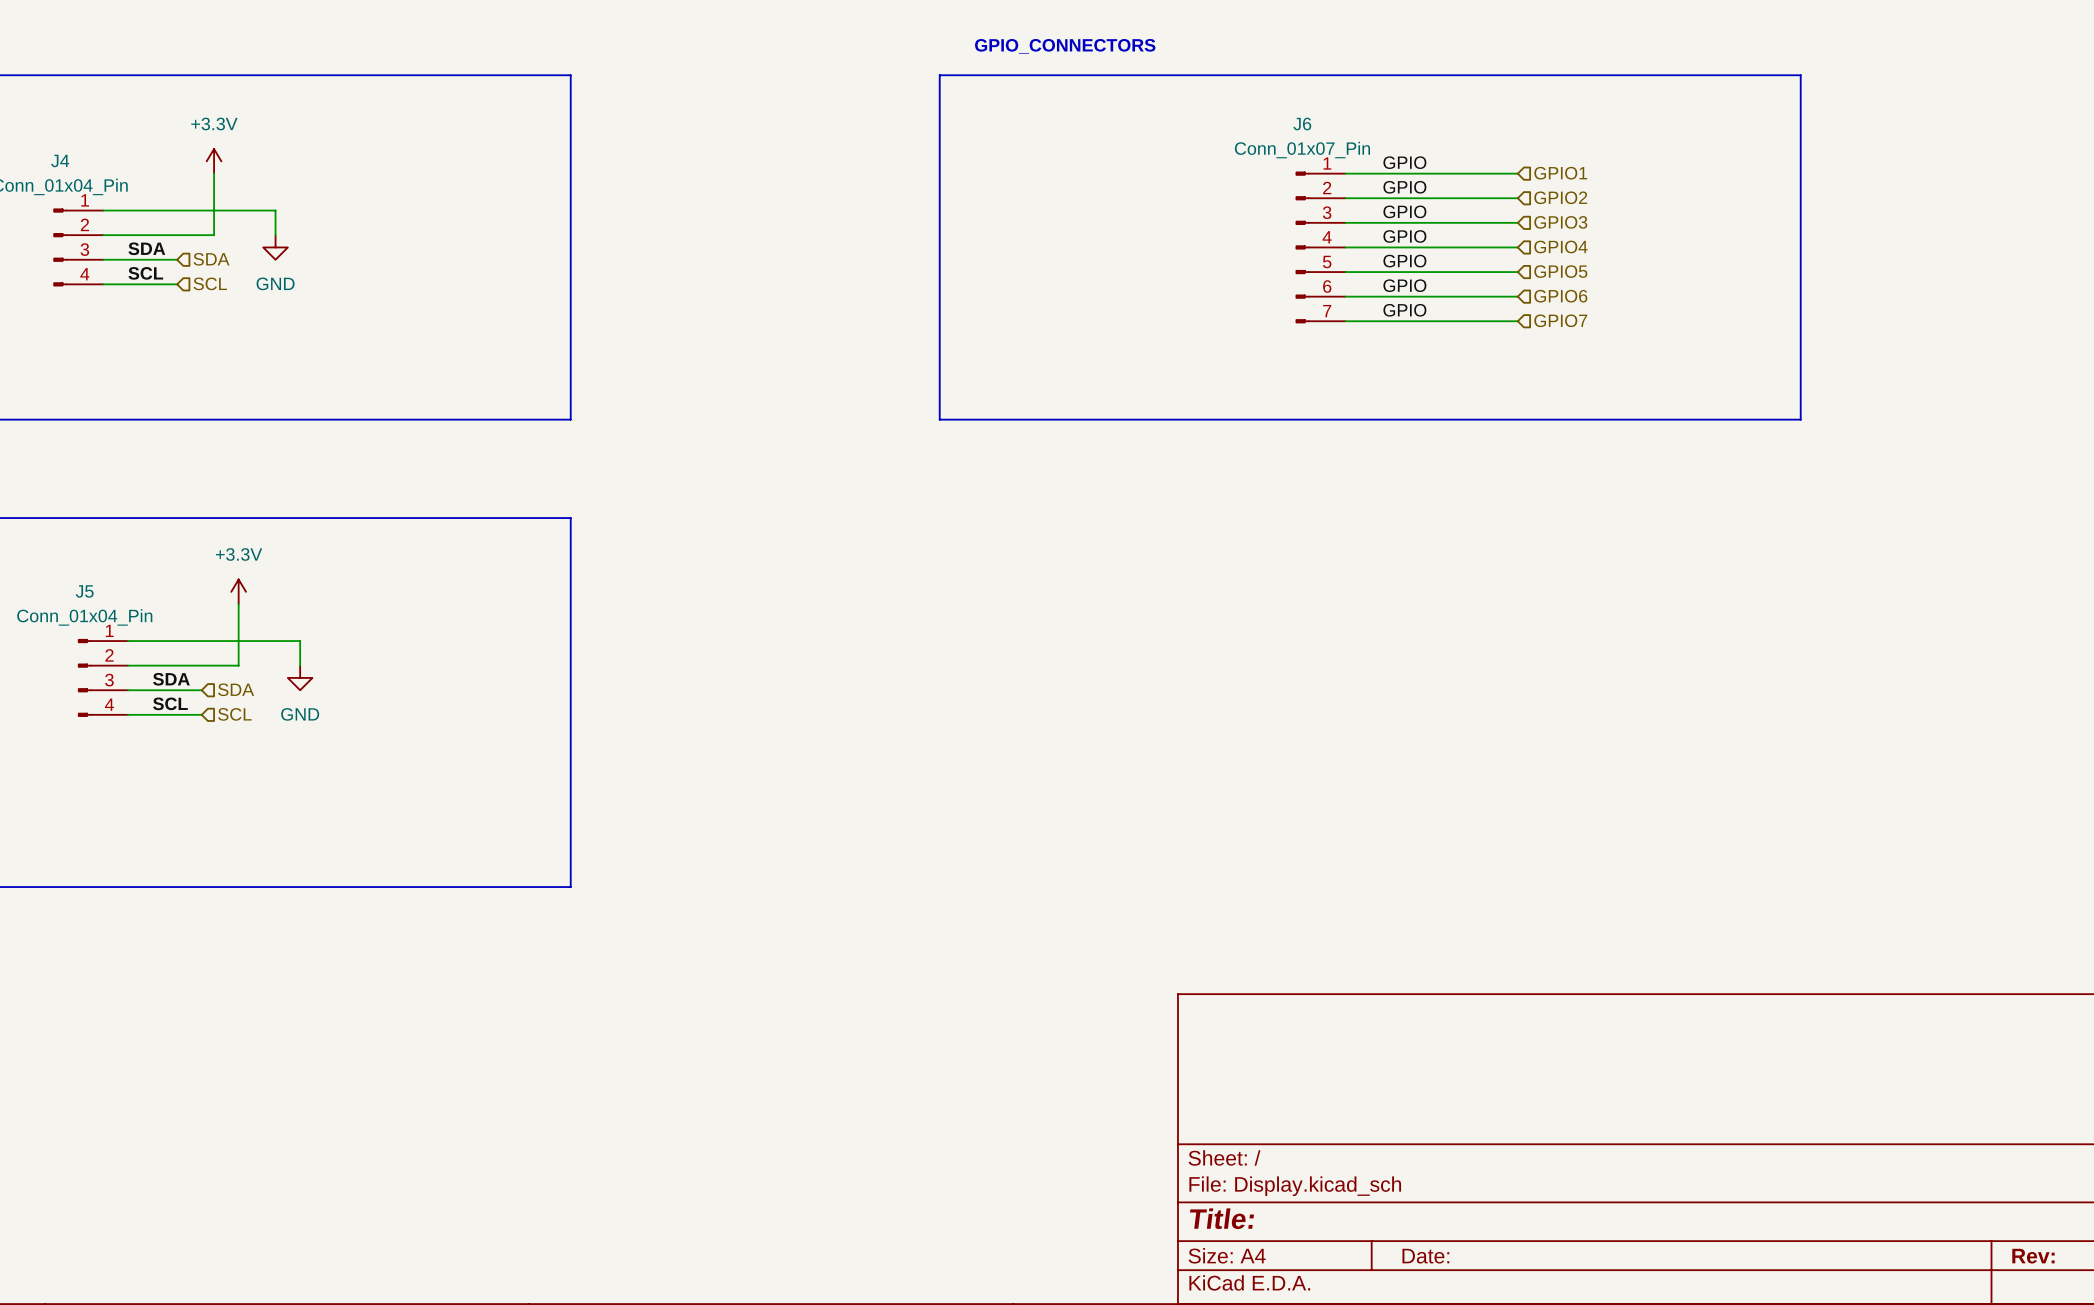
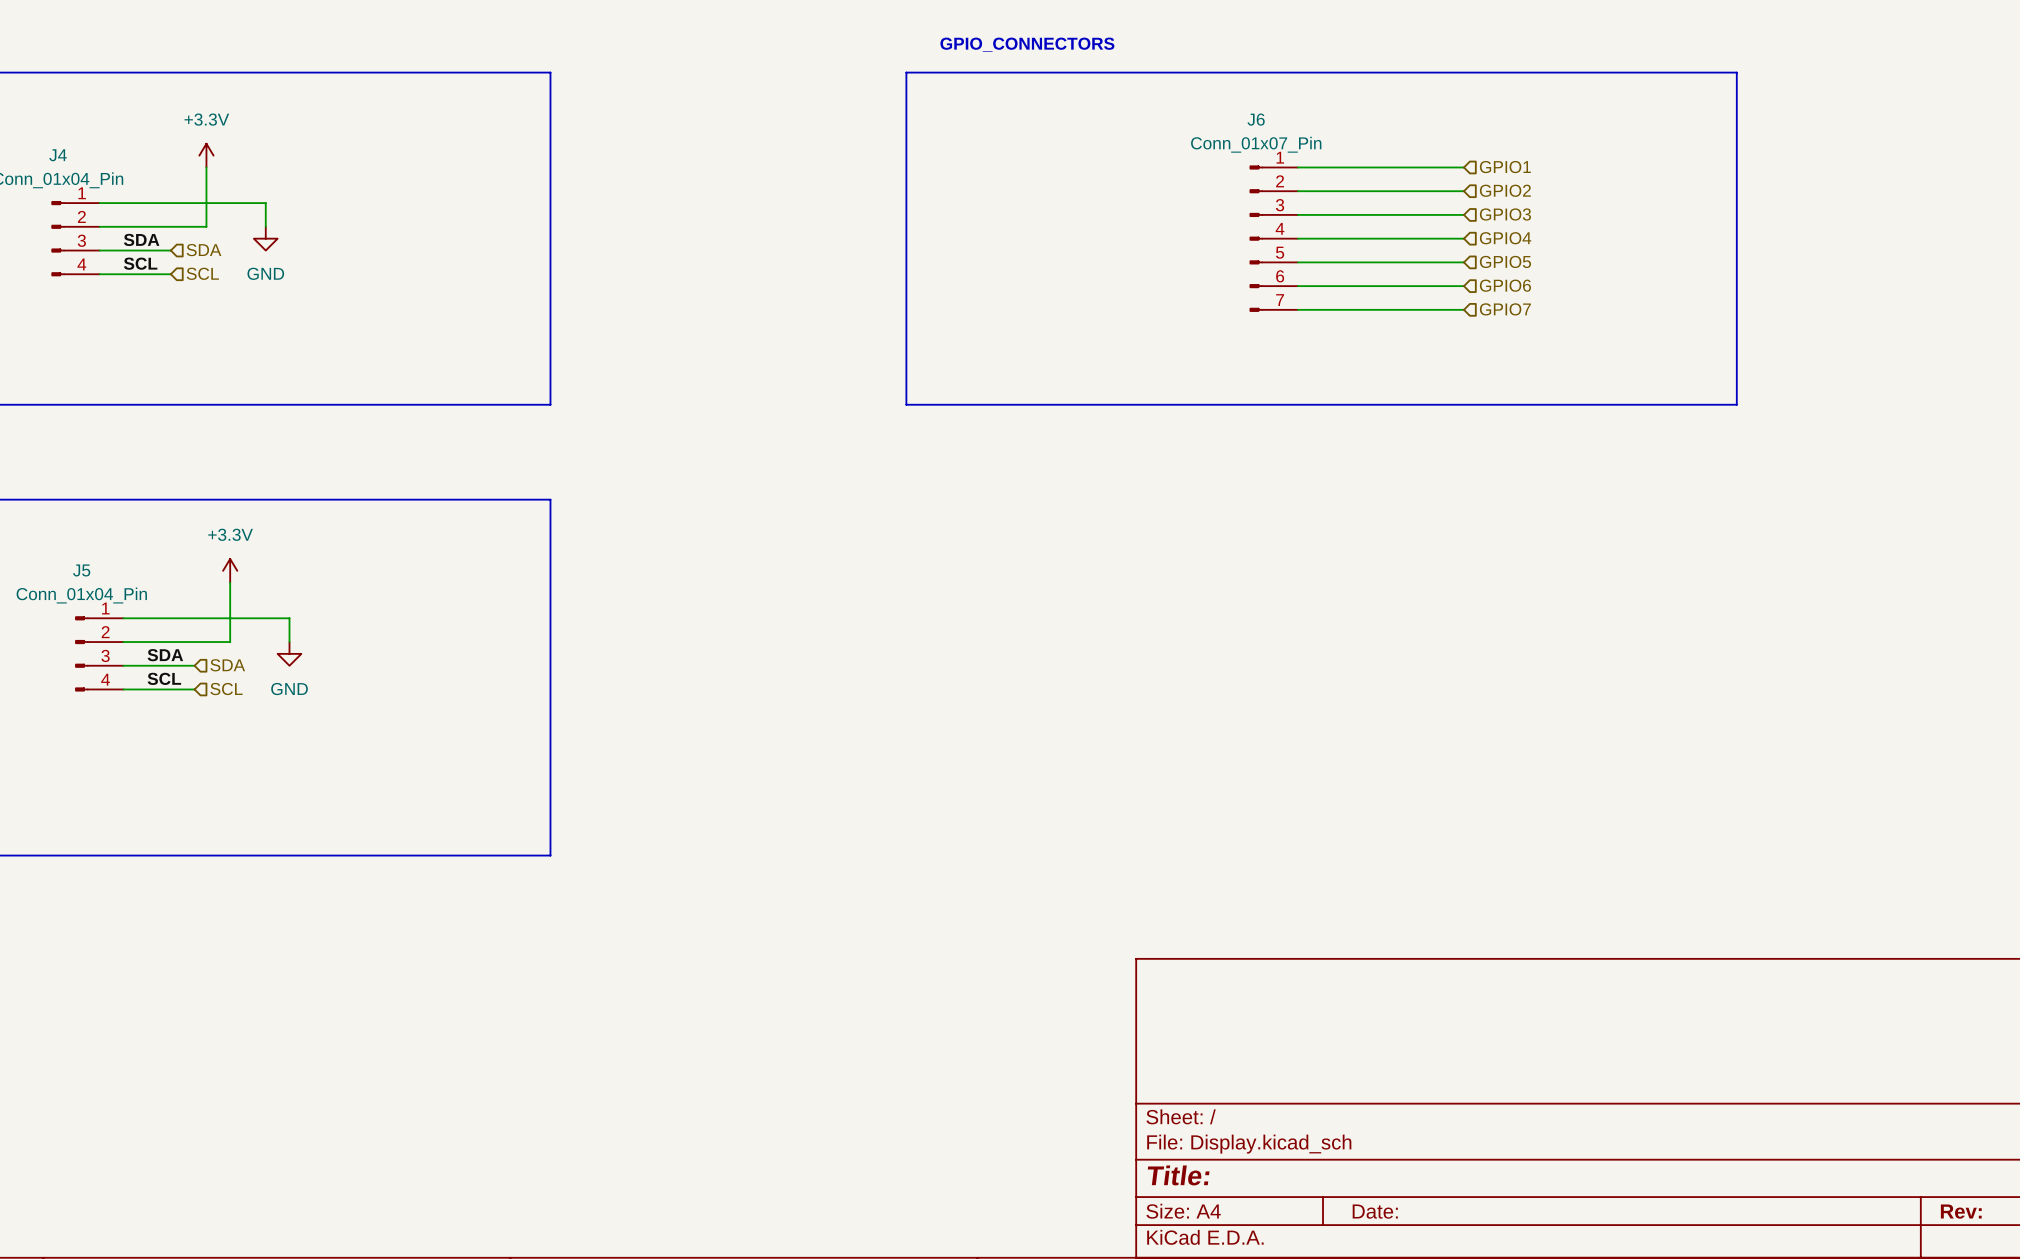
label: GPIO (1404, 162) -> none
label: GPIO (1404, 187) -> none
label: GPIO (1404, 211) -> none
label: GPIO (1404, 236) -> none
label: GPIO (1404, 261) -> none
label: GPIO (1404, 285) -> none
label: GPIO (1404, 310) -> none

